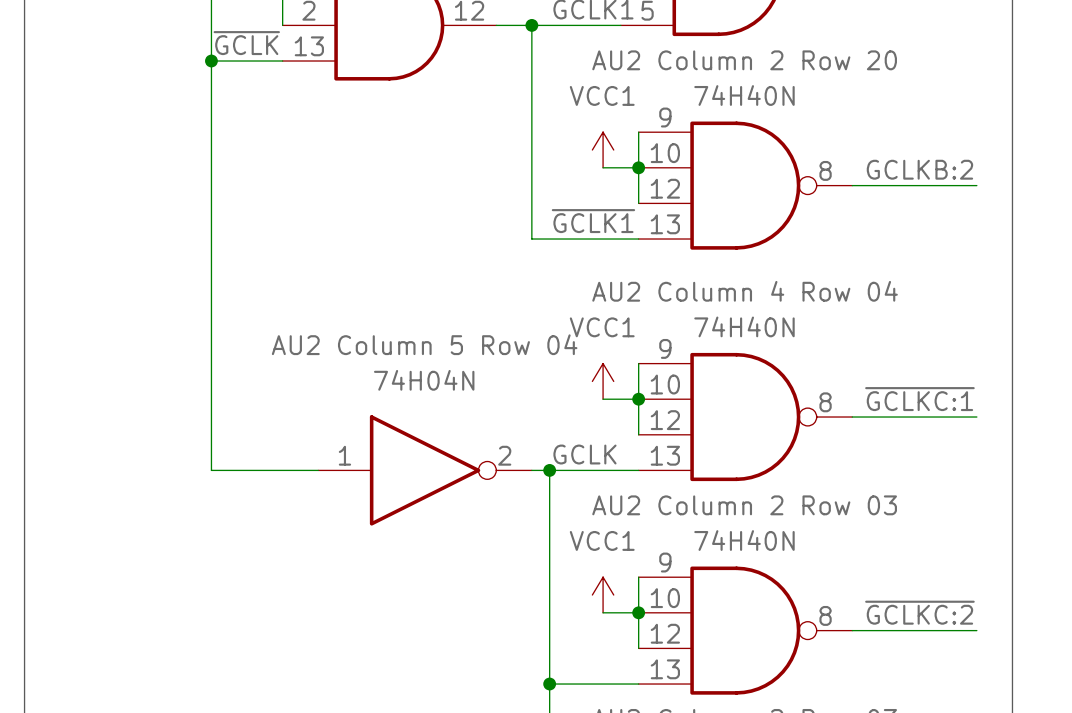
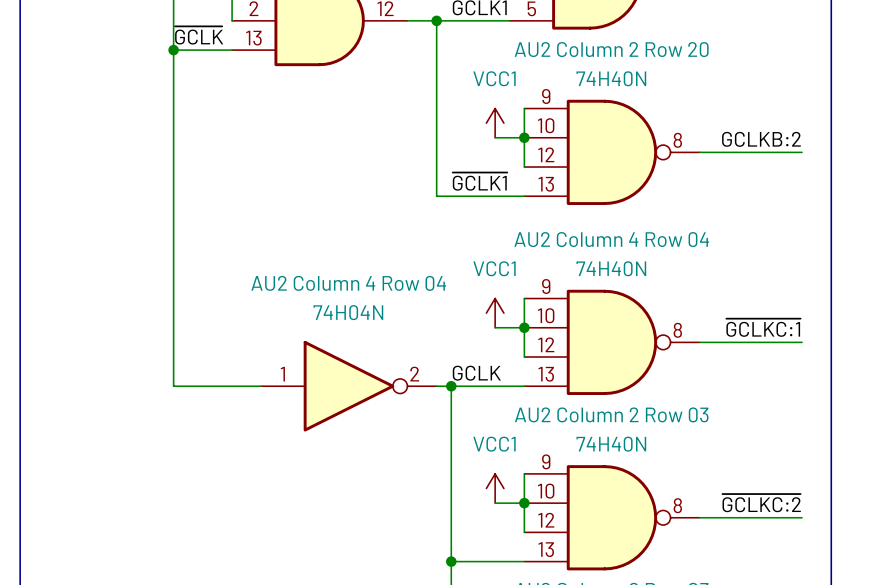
part text: AU2 Column 5 Row 04 (424, 344) -> AU2 Column 4 Row 04 (348, 283)

